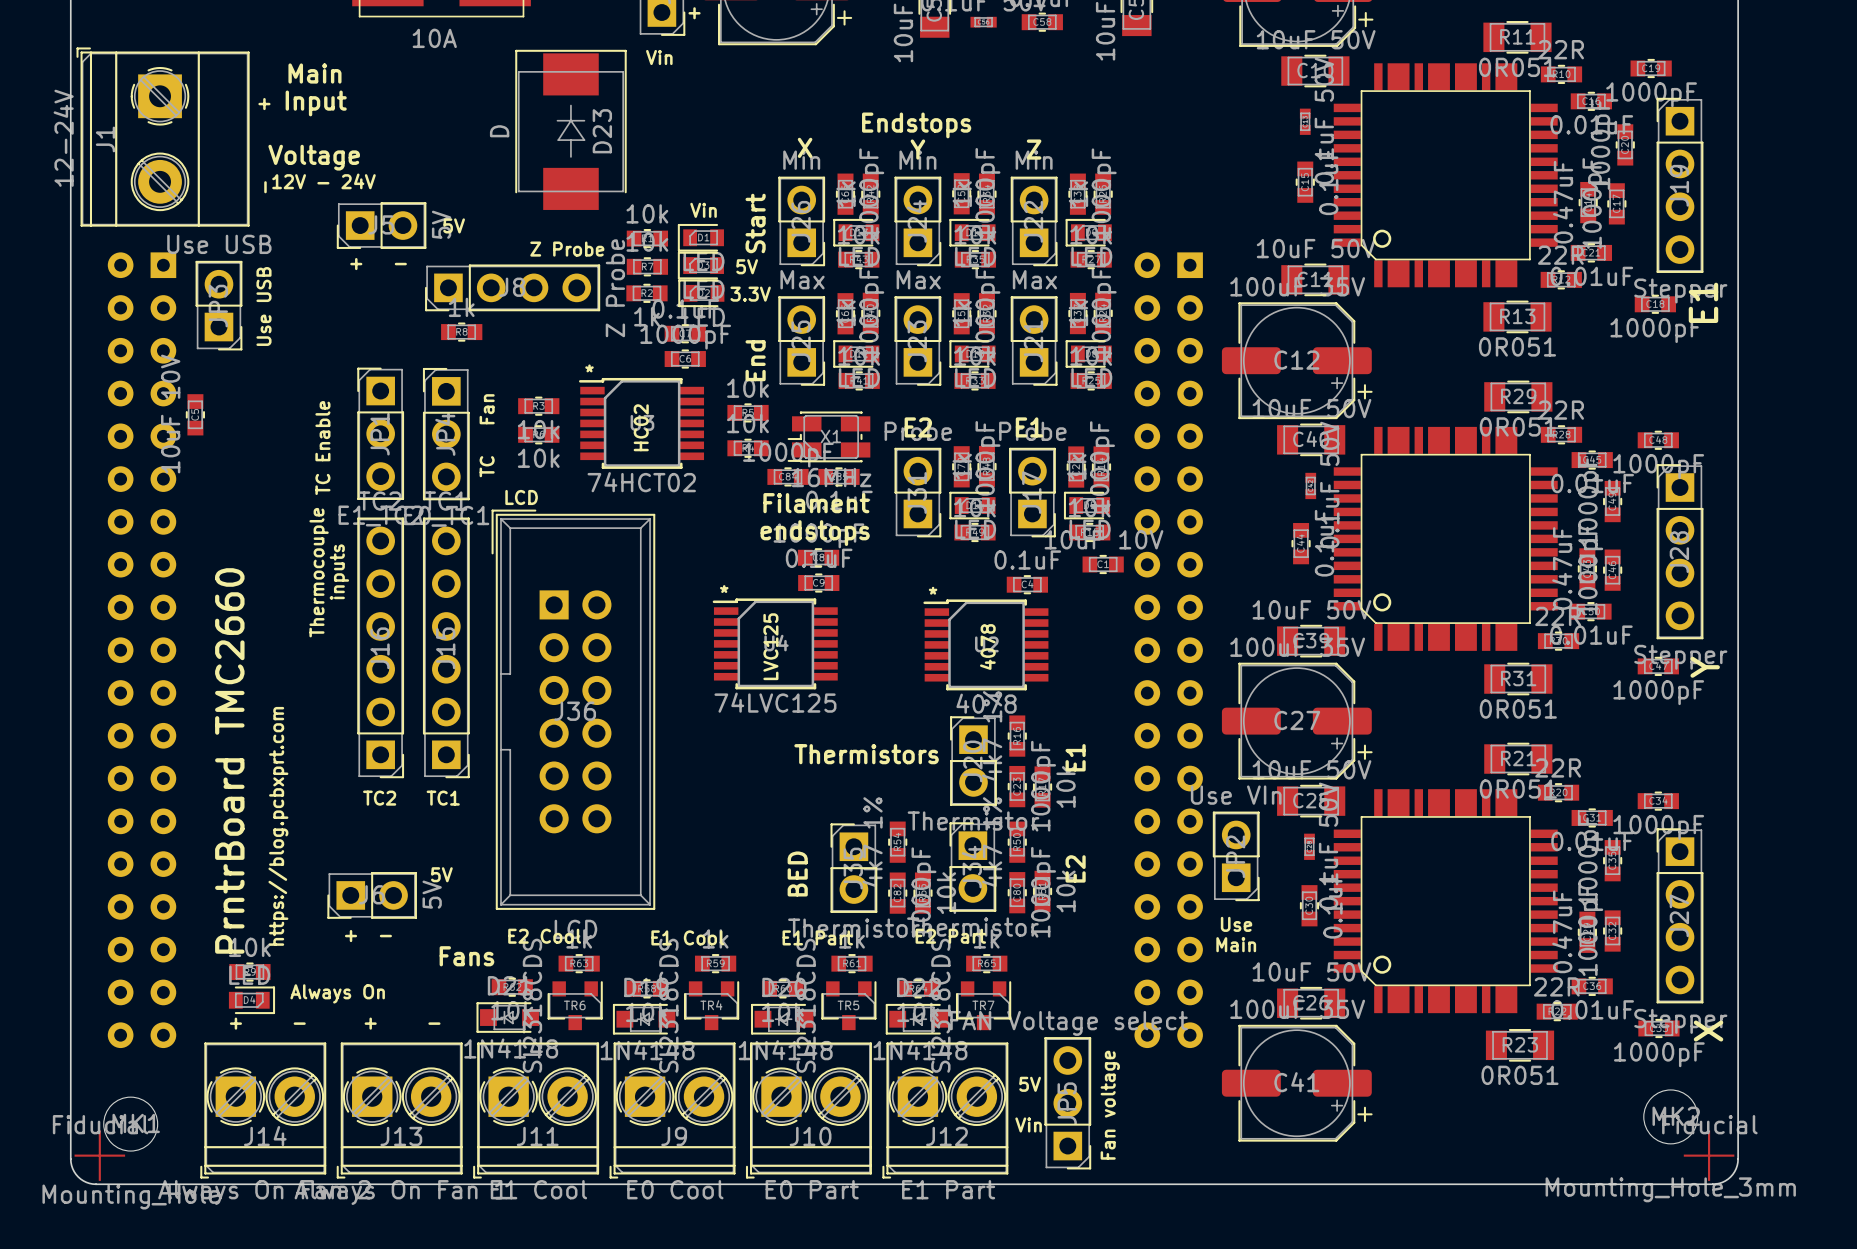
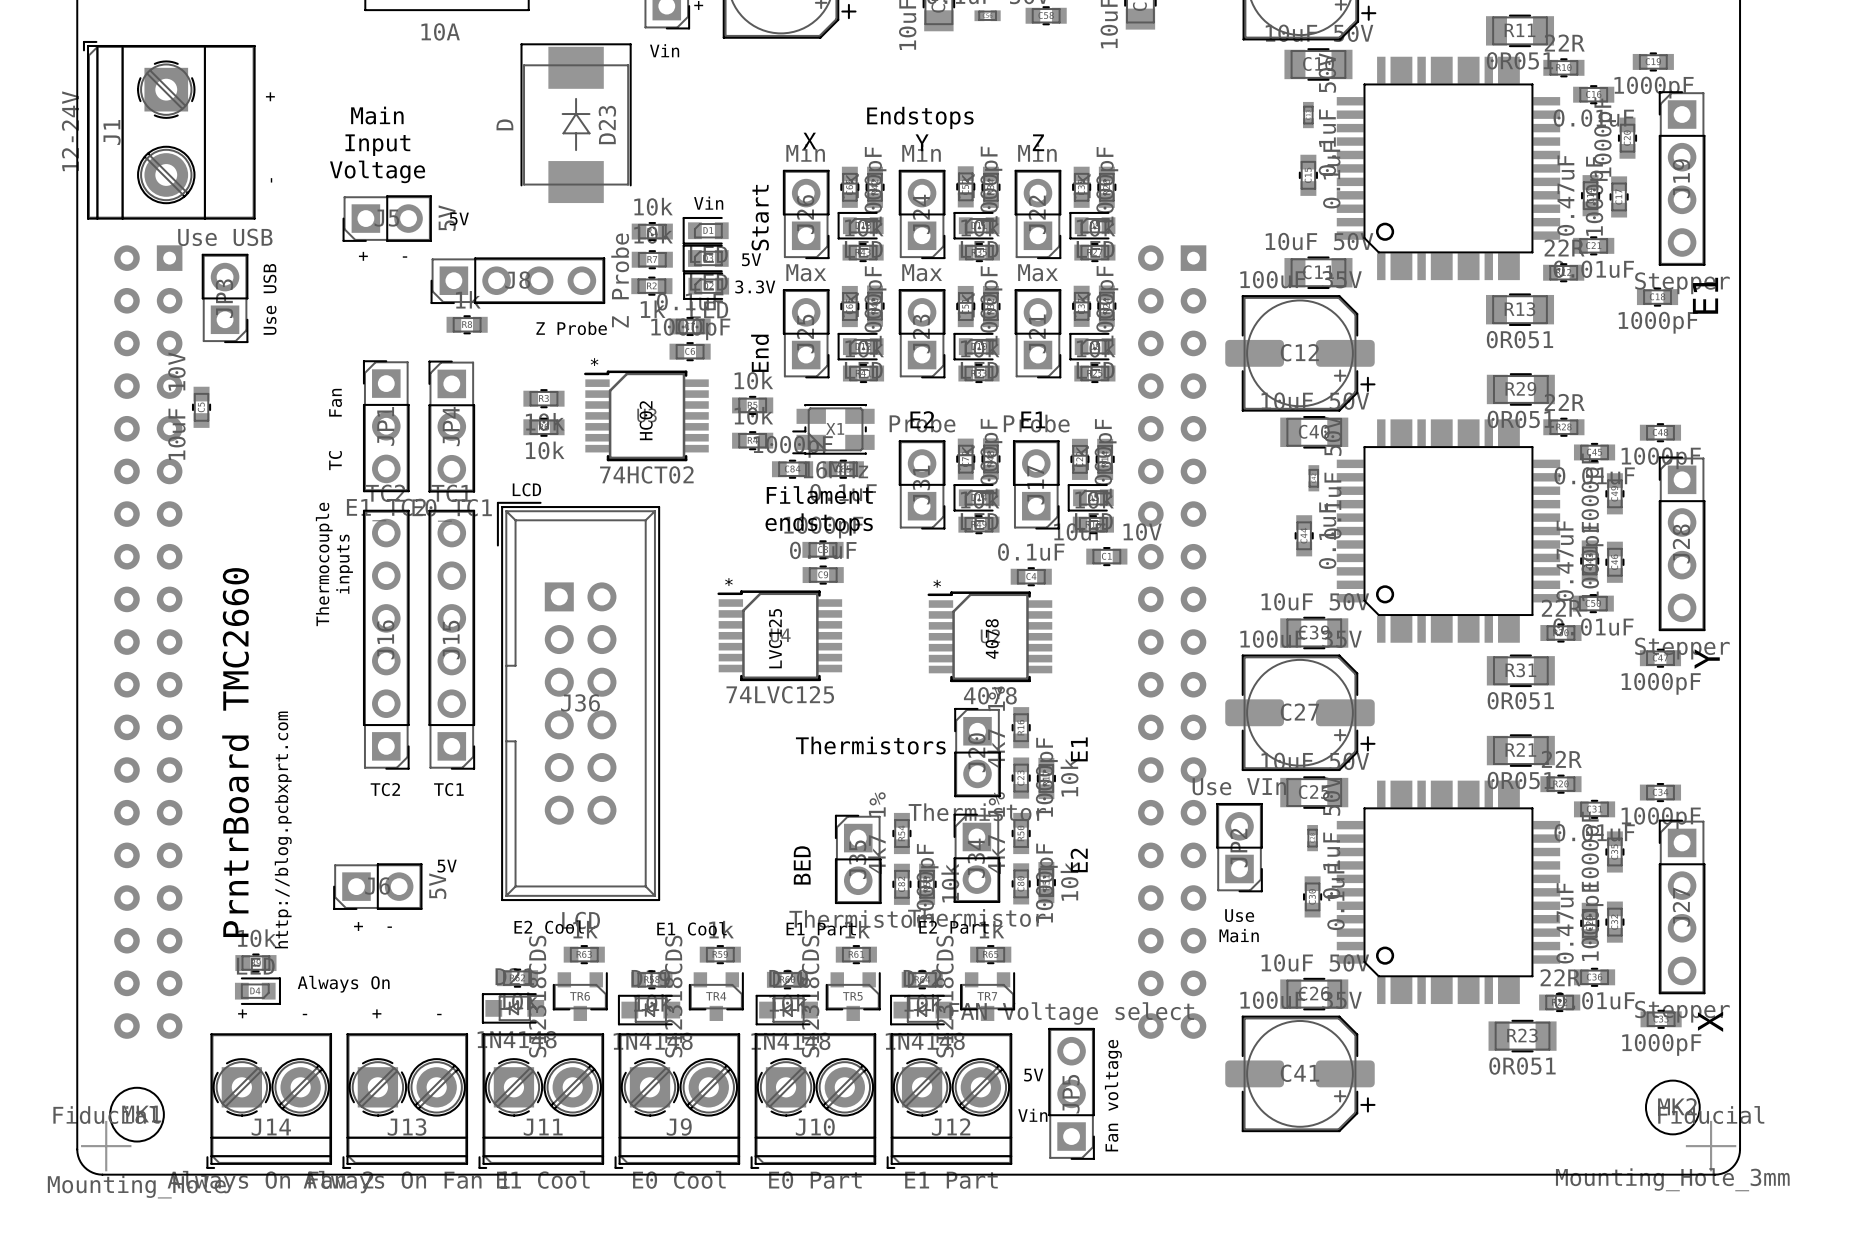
text position: Main (314, 73) -> Main (377, 115)
text position: Input (316, 103) -> Input (377, 145)
text position: Voltage (314, 157) -> Voltage (377, 171)
text: 12V - 24V (324, 181) -> none
text position: Z Probe (567, 249) -> Z Probe (571, 328)
text position: TC Fan (487, 435) -> TC Fan (335, 429)
text: TC Enable (322, 448) -> none
text: https://blog.pcbxprt.com (278, 826) -> http://blog.pcbxprt.com (283, 829)
text: Fans (466, 956) -> none

